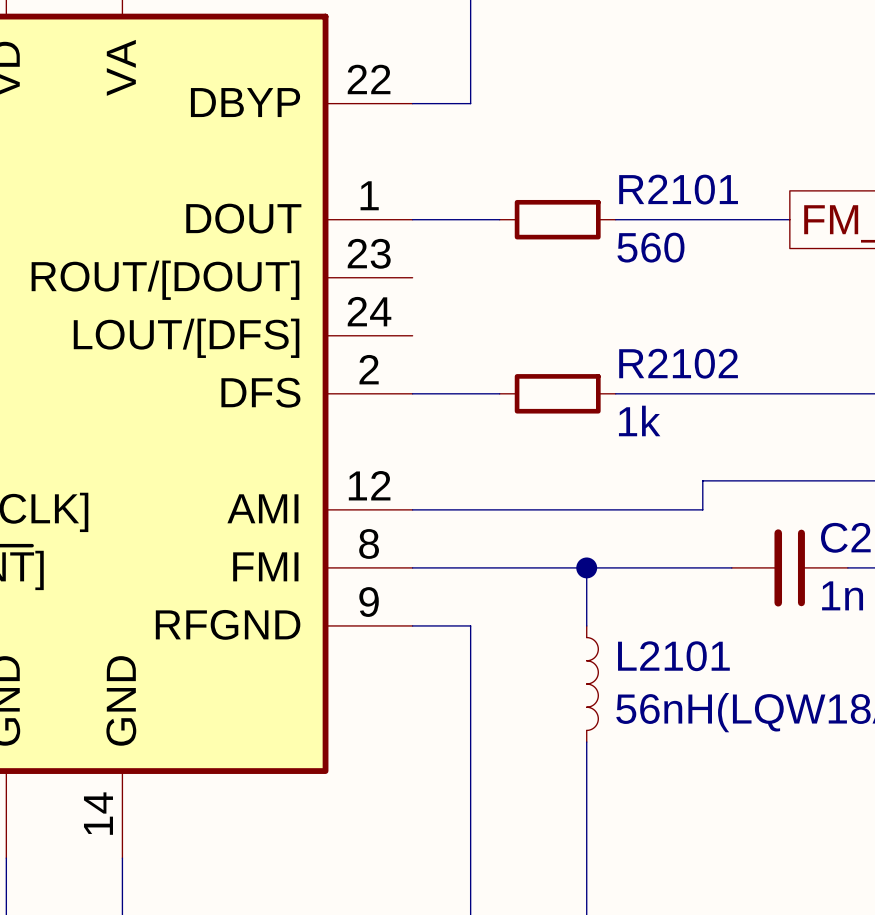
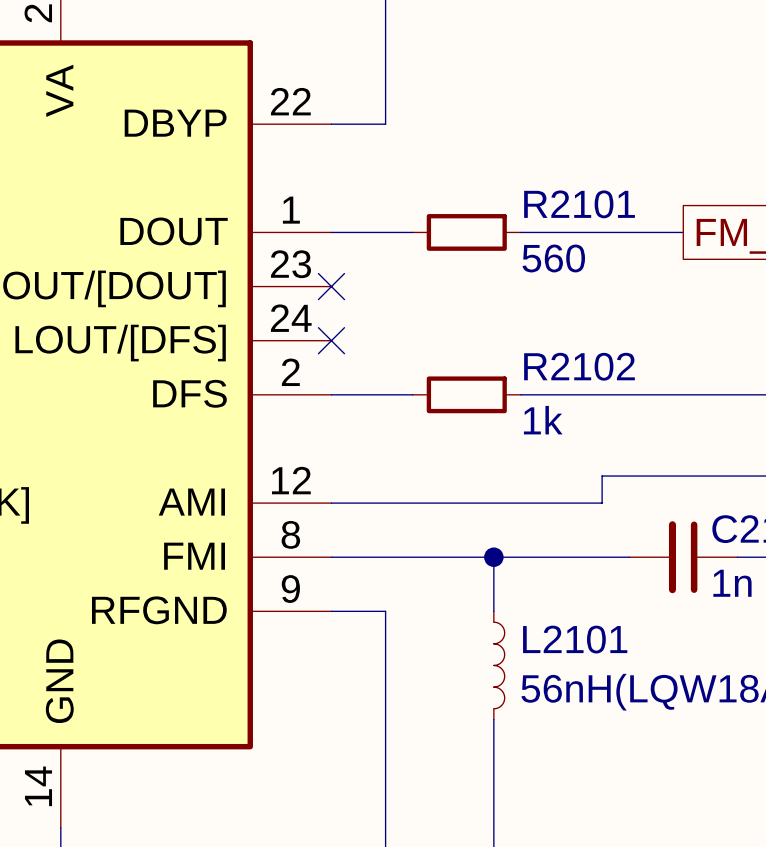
no-connect mark: none -> (331, 286)
no-connect mark: none -> (331, 340)

